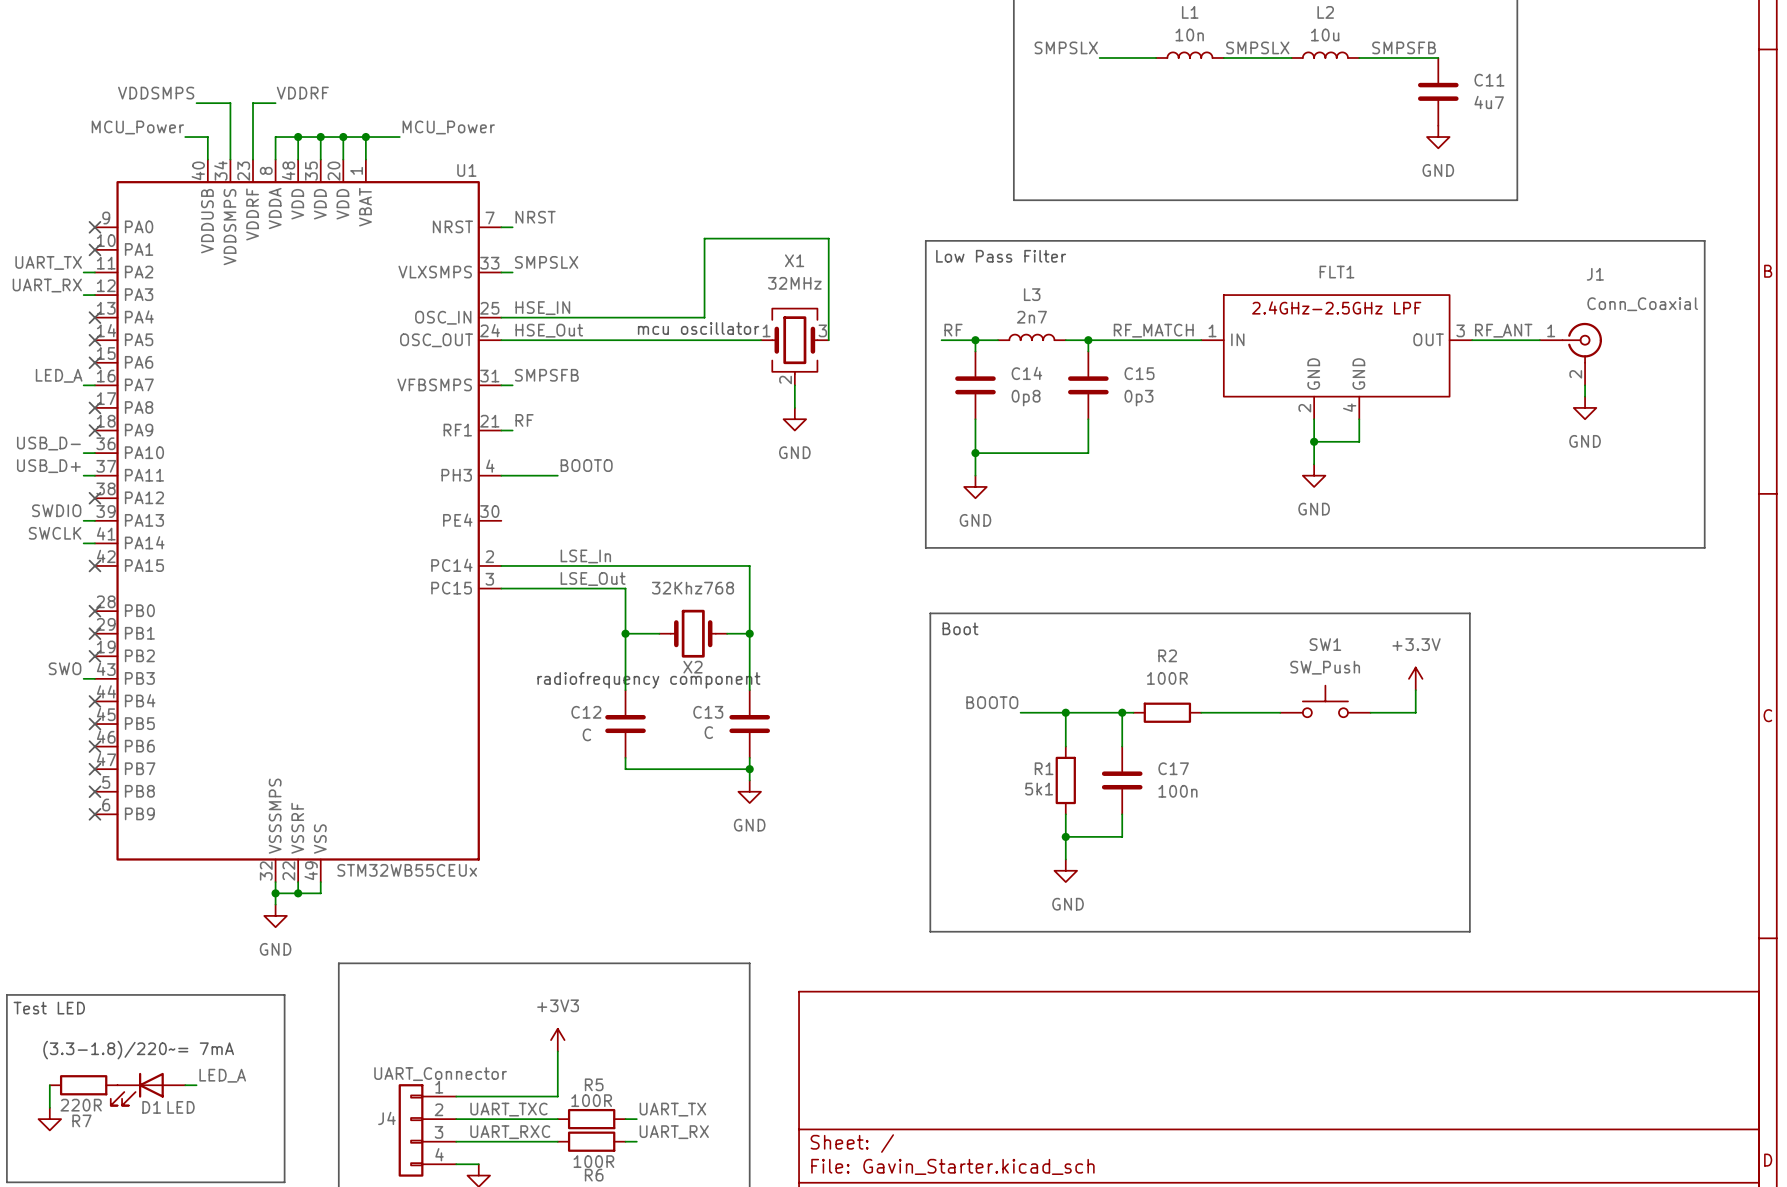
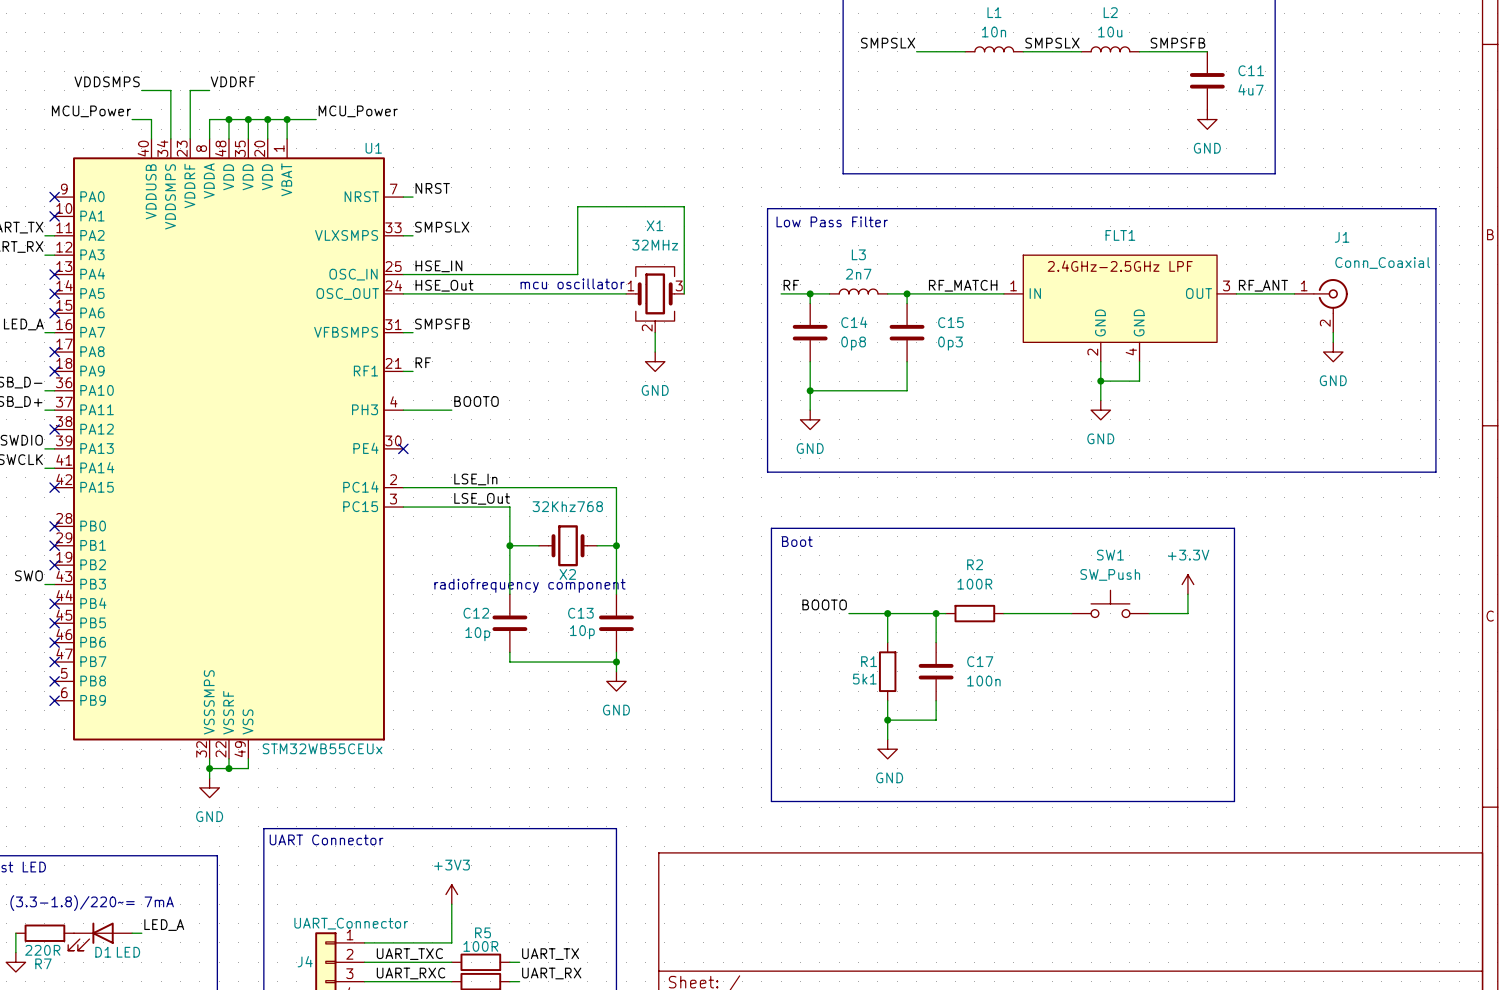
no-connect mark: none -> (403, 448)
C13 value: C (708, 732) -> 10p (582, 632)
C12 value: C (586, 734) -> 10p (477, 634)
text: none -> UART Connector (326, 839)

